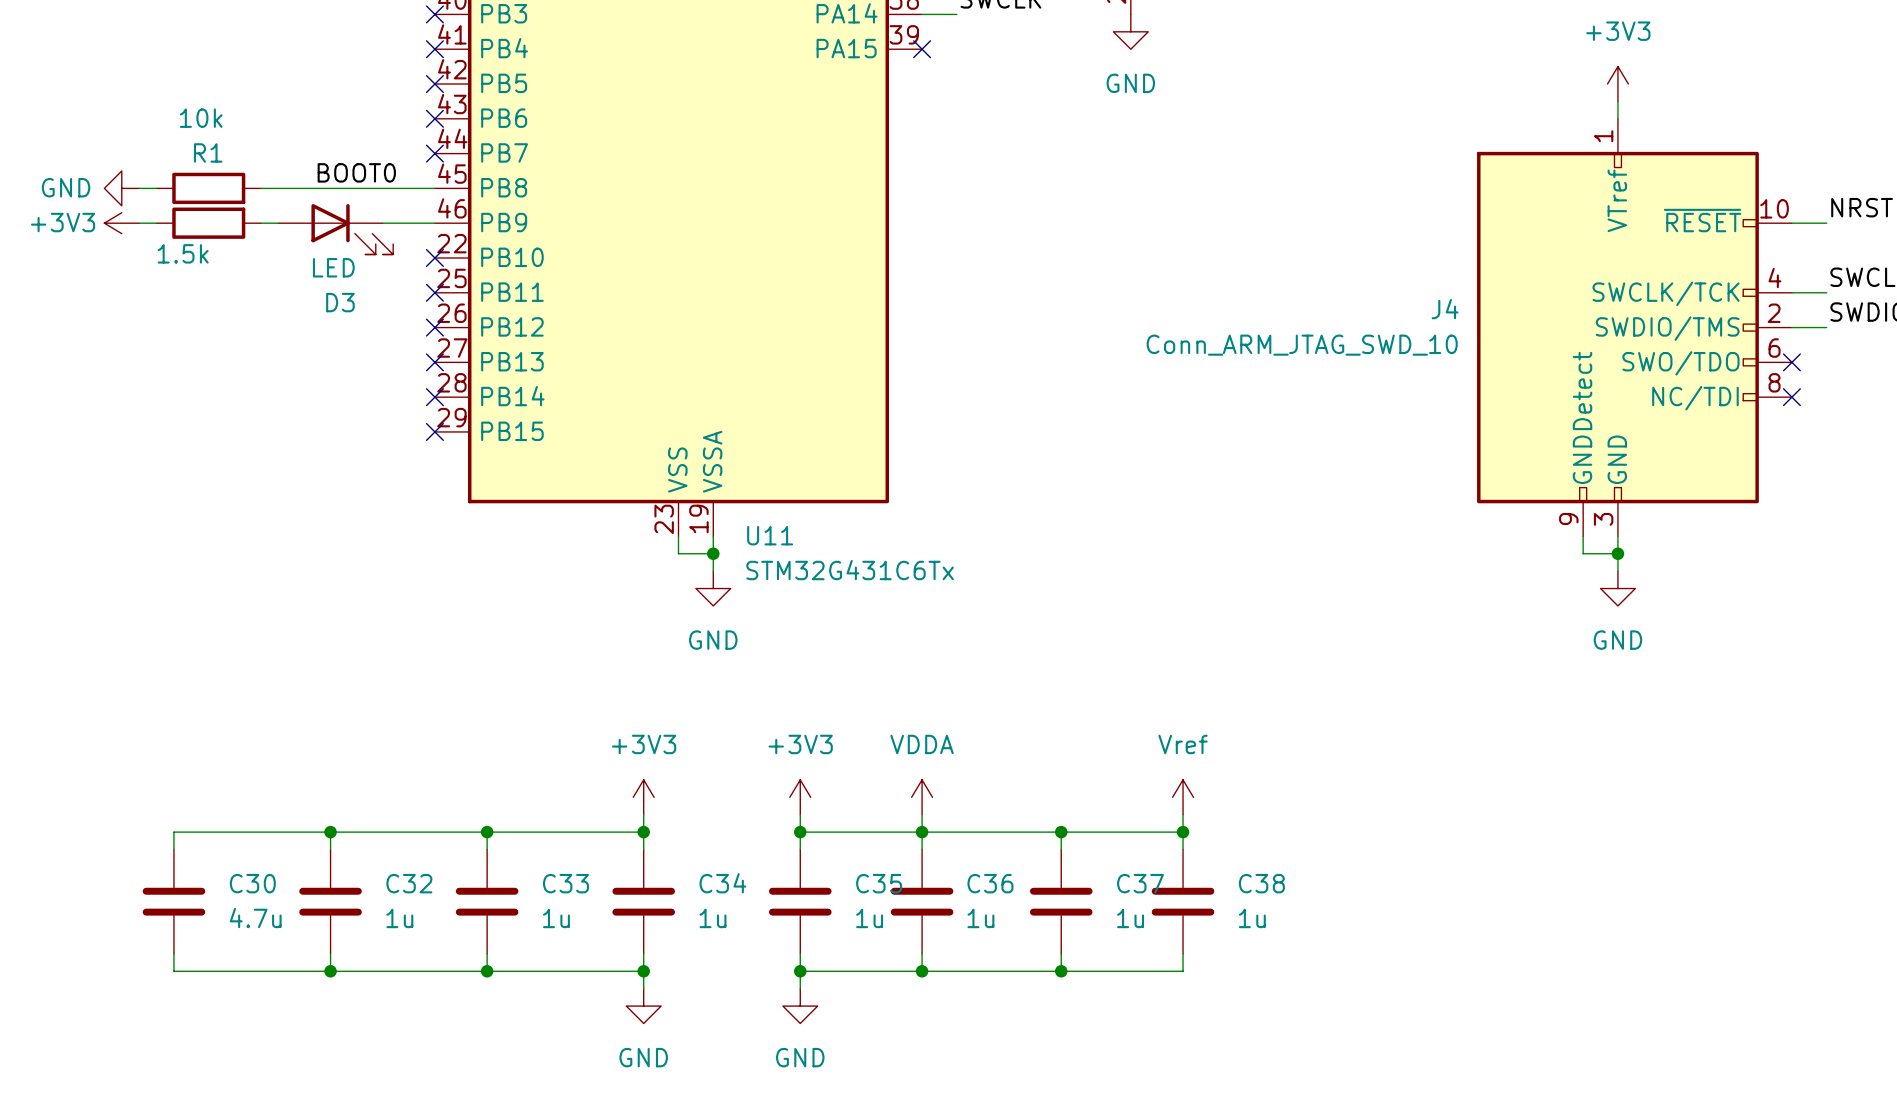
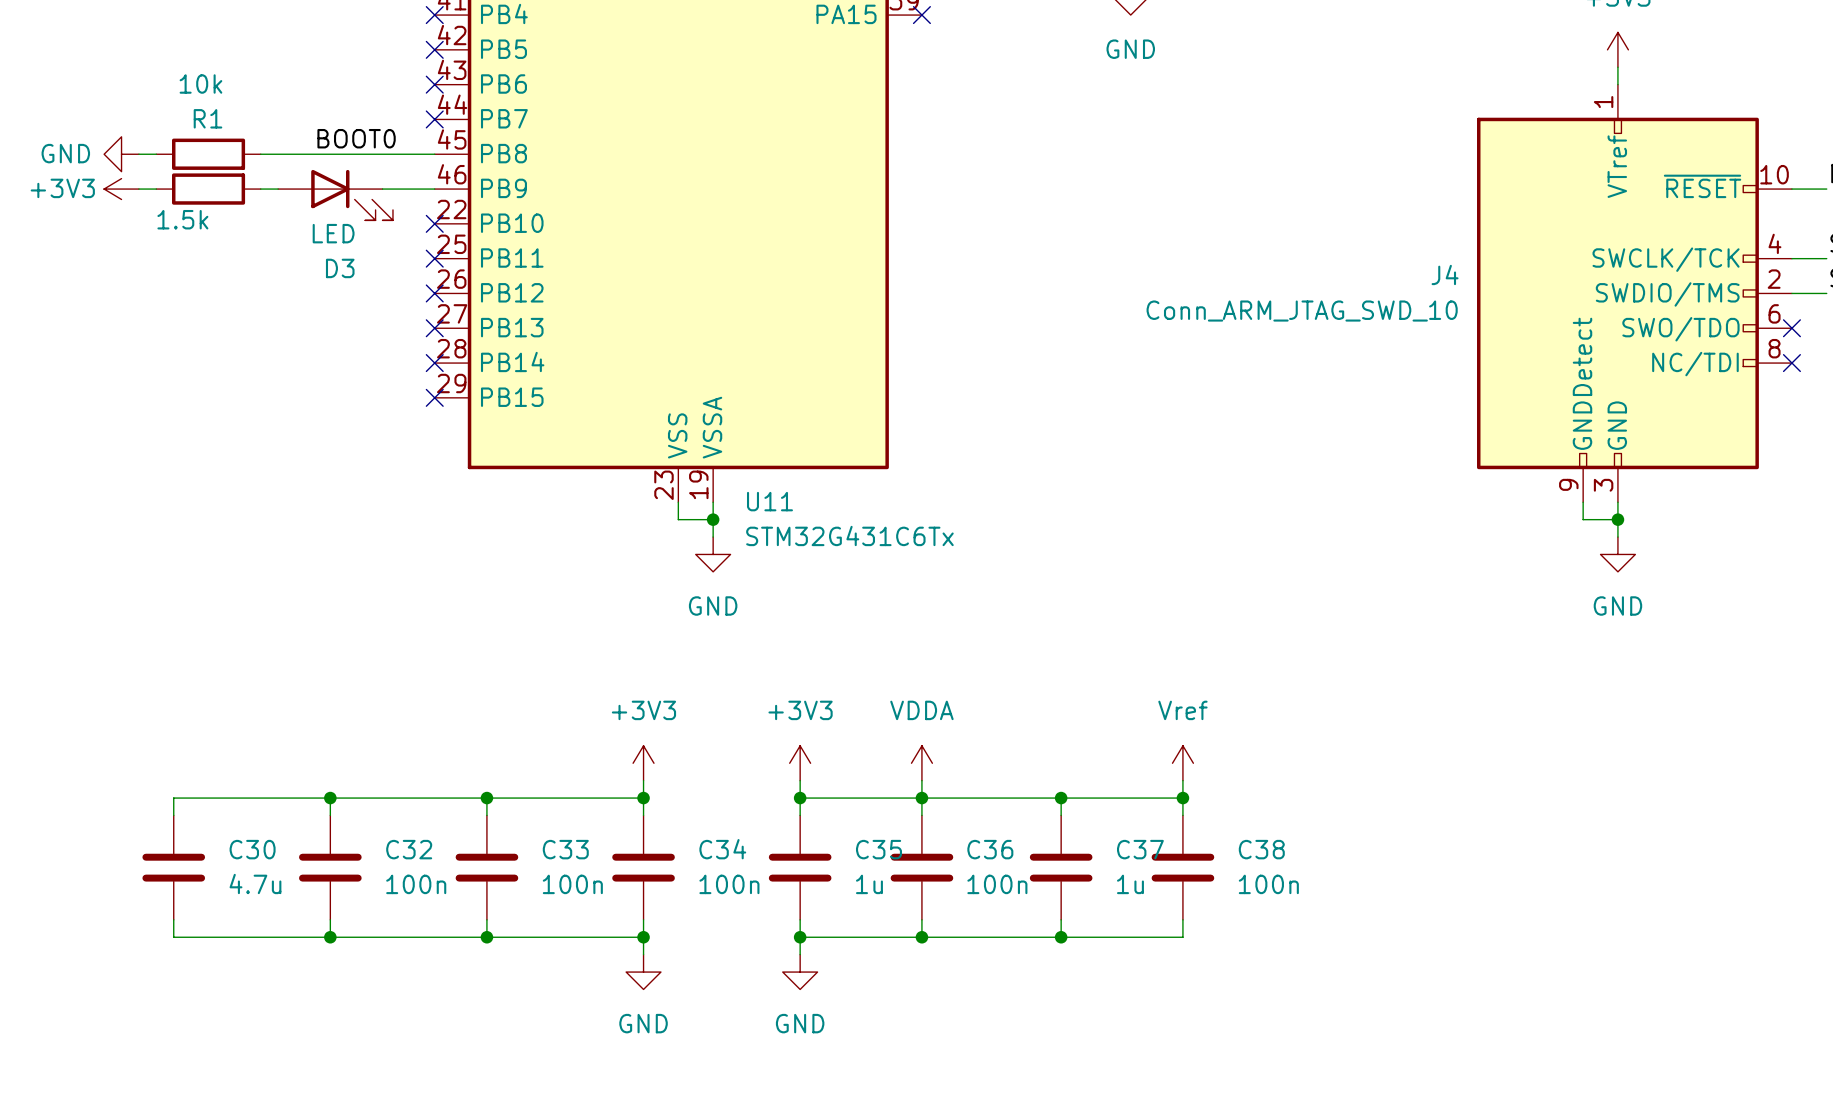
C32 value: 1u (399, 918) -> 100n (416, 884)
C33 value: 1u (556, 918) -> 100n (572, 884)
C34 value: 1u (713, 918) -> 100n (729, 884)
C36 value: 1u (980, 918) -> 100n (997, 884)
C38 value: 1u (1252, 918) -> 100n (1268, 884)

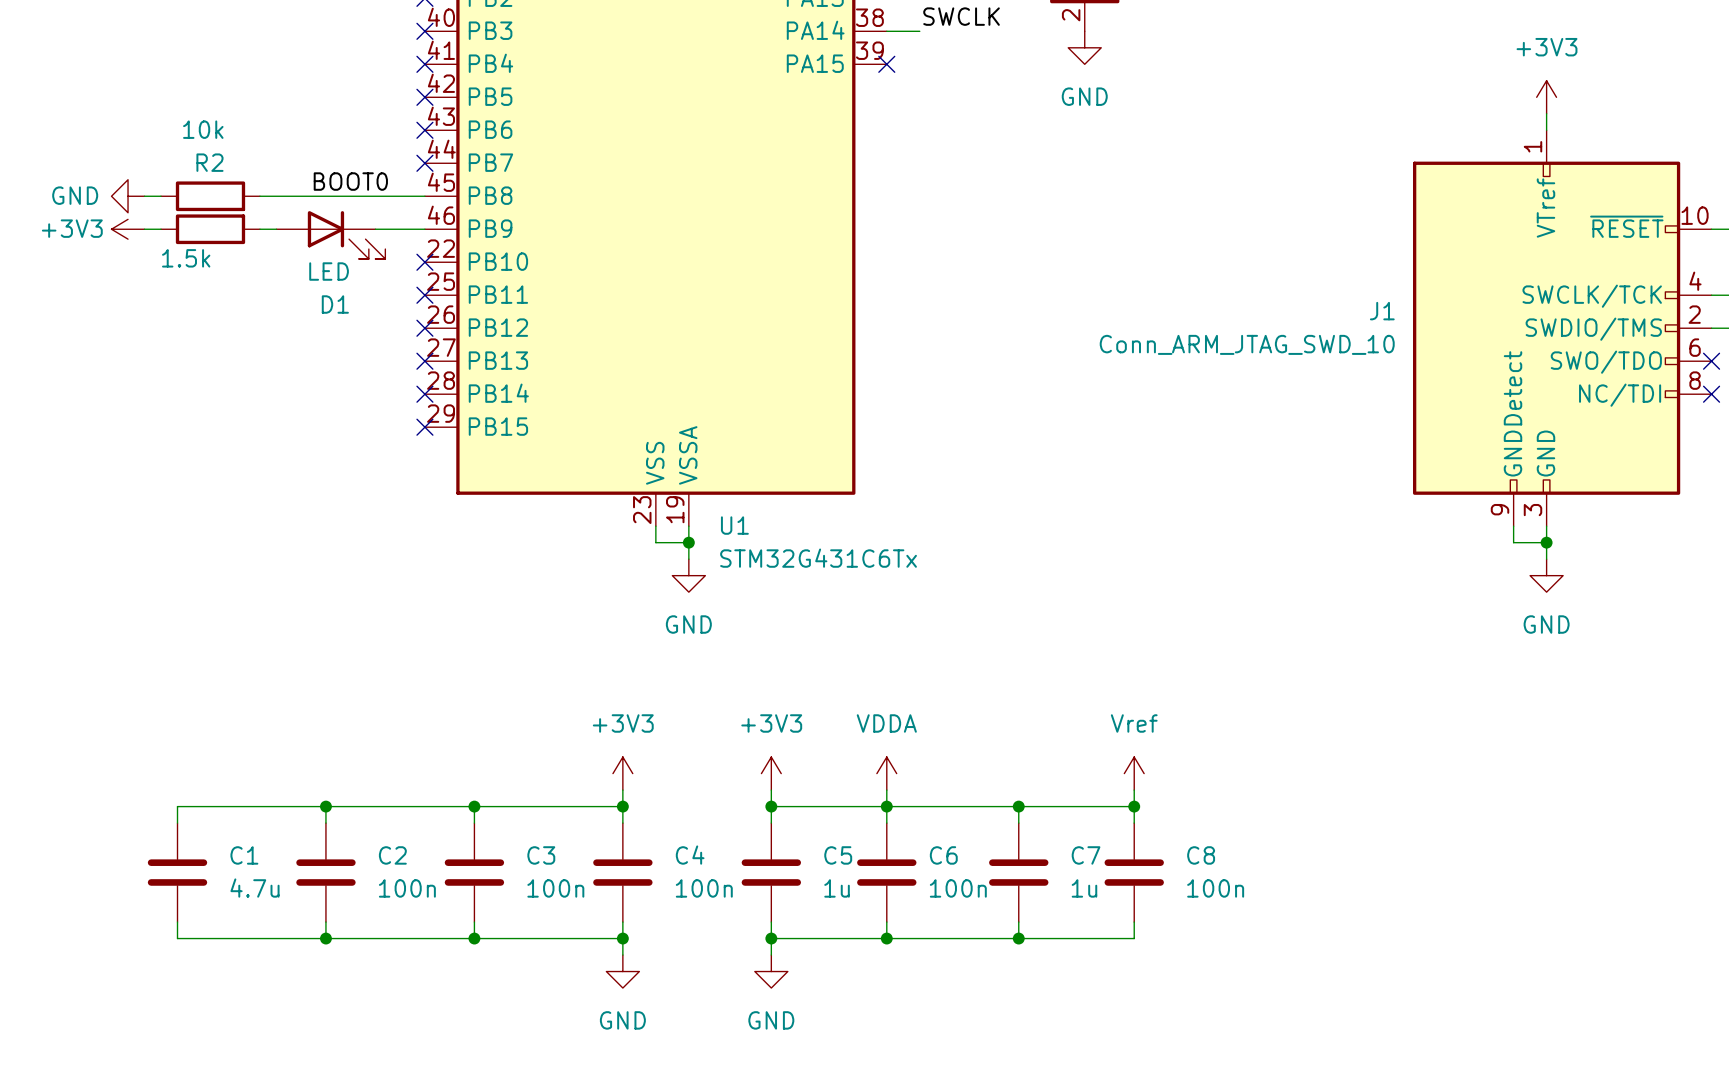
R1 name: R1 (207, 118) -> R2 (209, 162)
D3 name: D3 (340, 268) -> D1 (335, 304)
J4 name: J4 (1445, 274) -> J1 (1382, 311)
U11 name: U11 (769, 501) -> U1 (734, 525)
C30 name: C30 (252, 849) -> C1 (244, 855)
C32 name: C32 (409, 849) -> C2 (392, 855)
C33 name: C33 (565, 849) -> C3 (541, 855)
C34 name: C34 (722, 849) -> C4 (690, 855)
C35 name: C35 (878, 849) -> C5 (838, 855)
C36 name: C36 (990, 849) -> C6 (943, 855)
C37 name: C37 (1140, 849) -> C7 (1086, 855)
C38 name: C38 (1261, 849) -> C8 (1201, 855)

